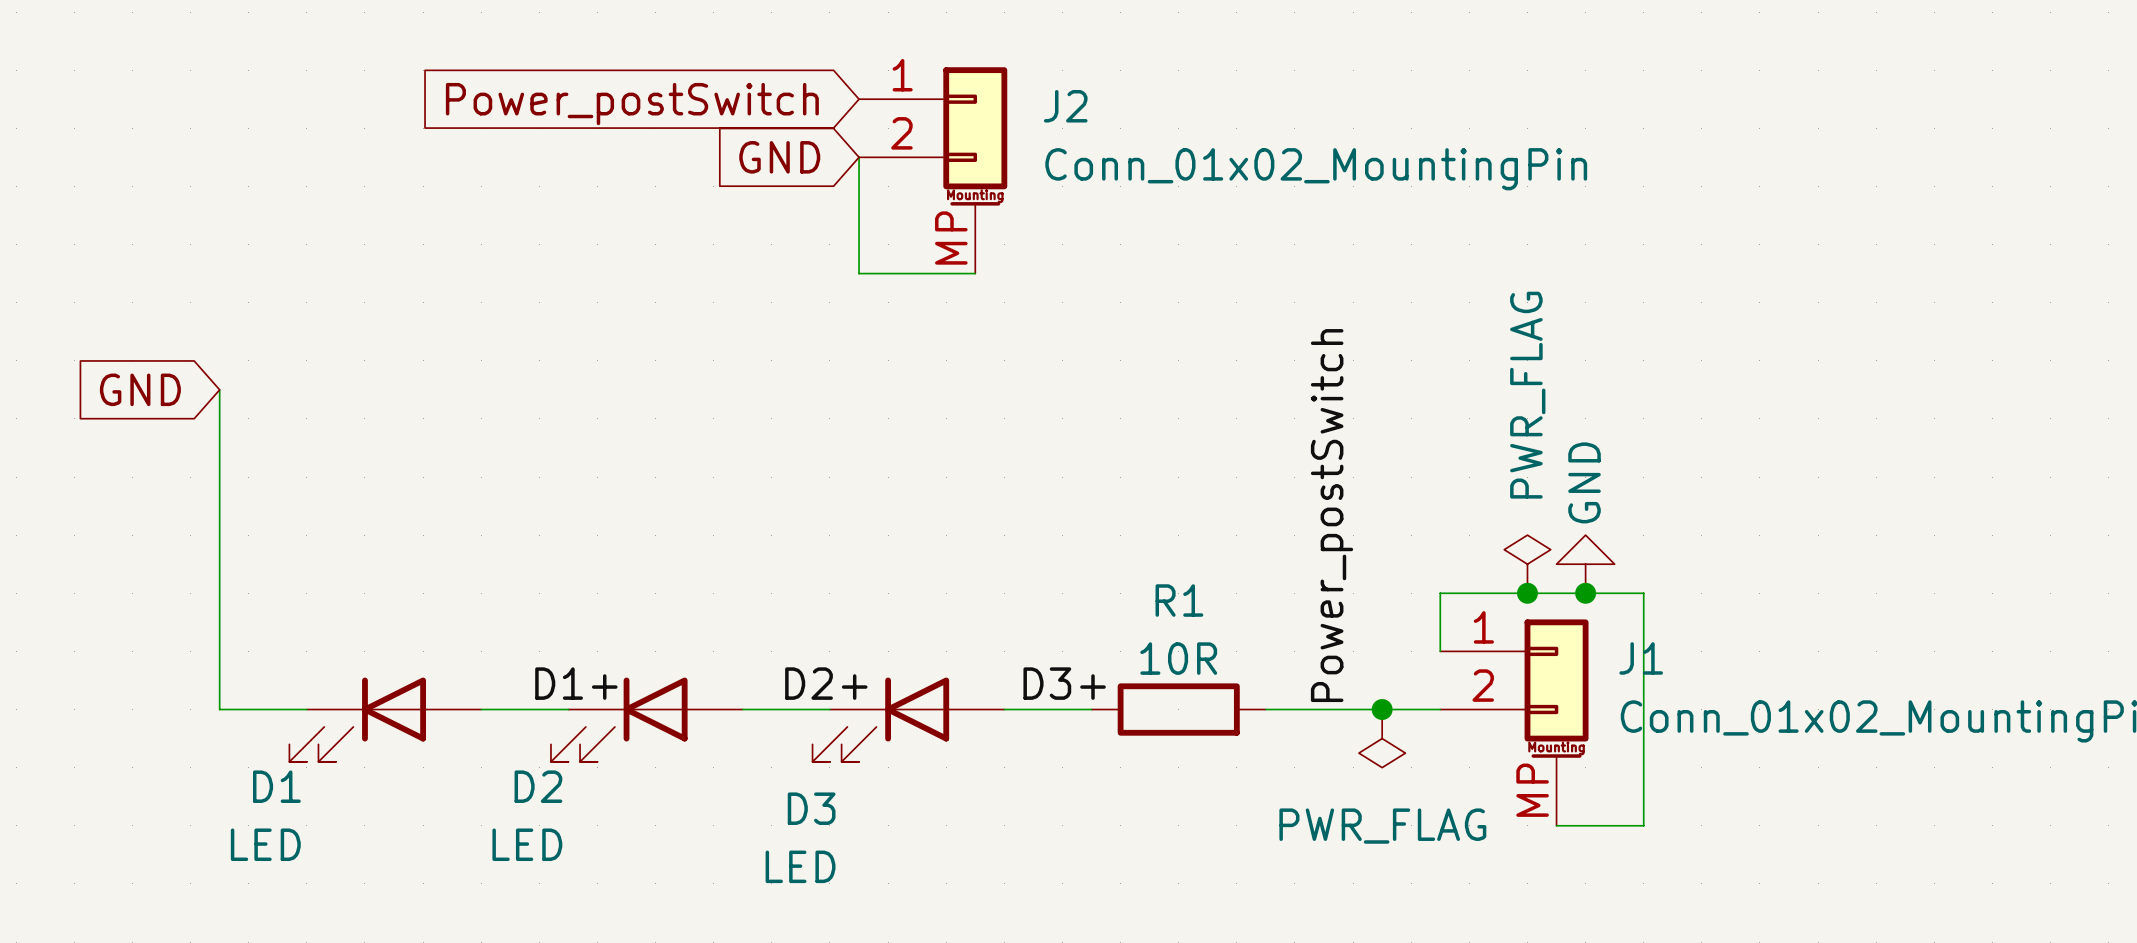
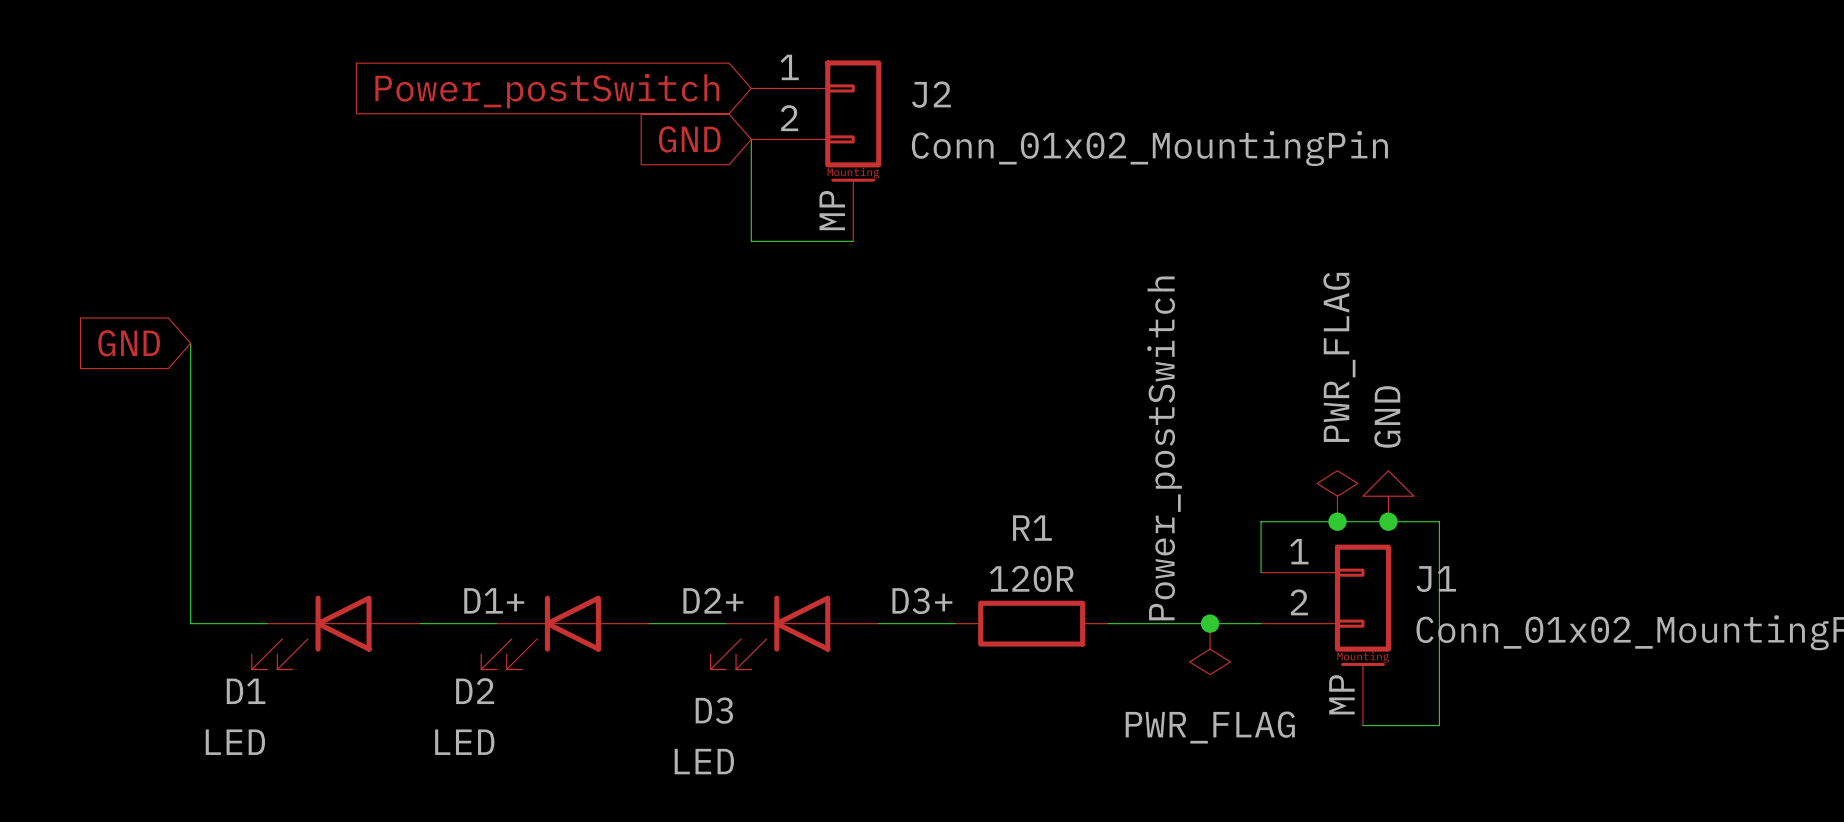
R1 value: 10R (1178, 658) -> 120R (1031, 578)

